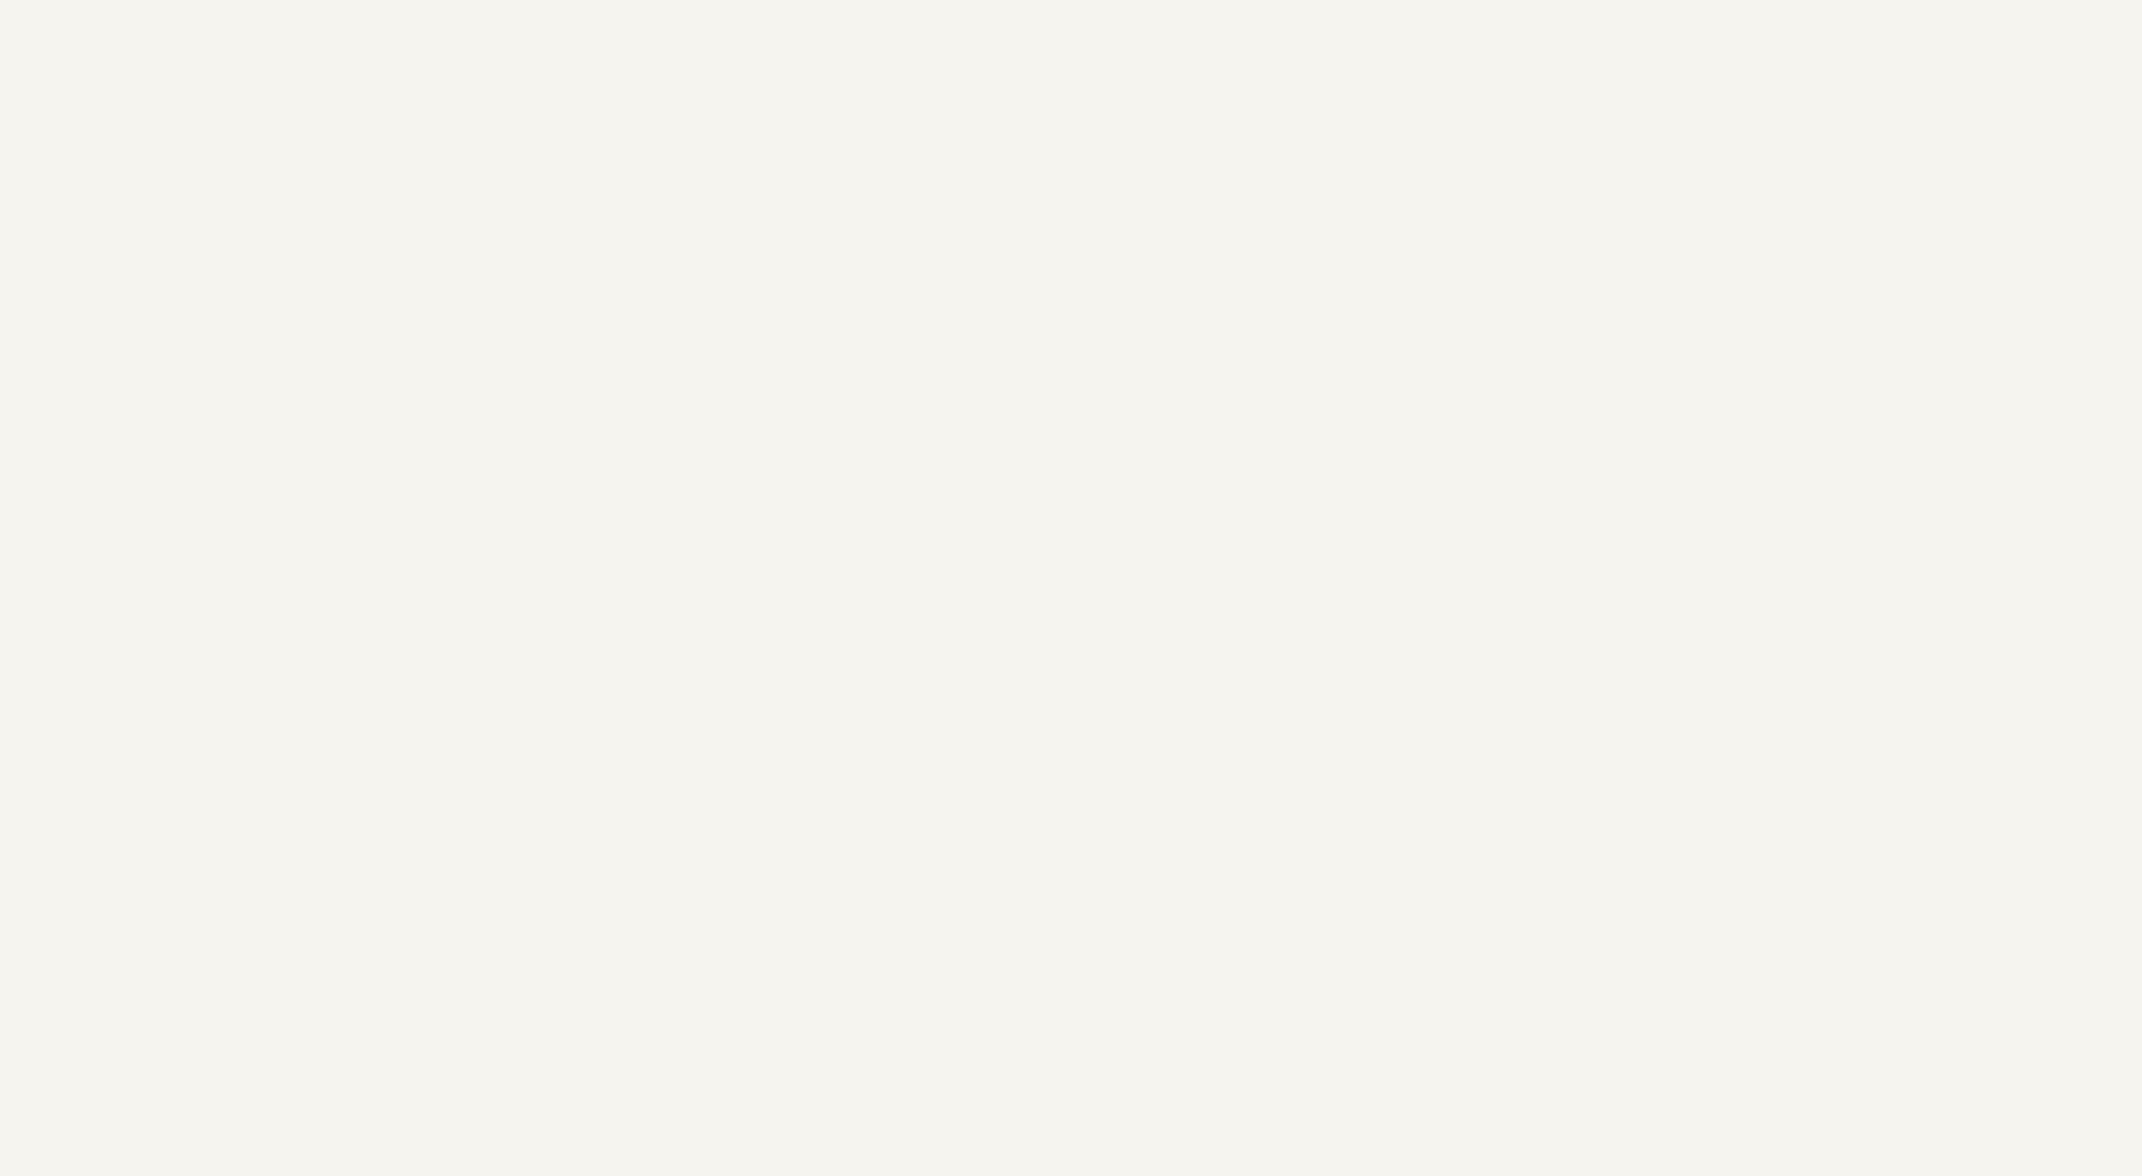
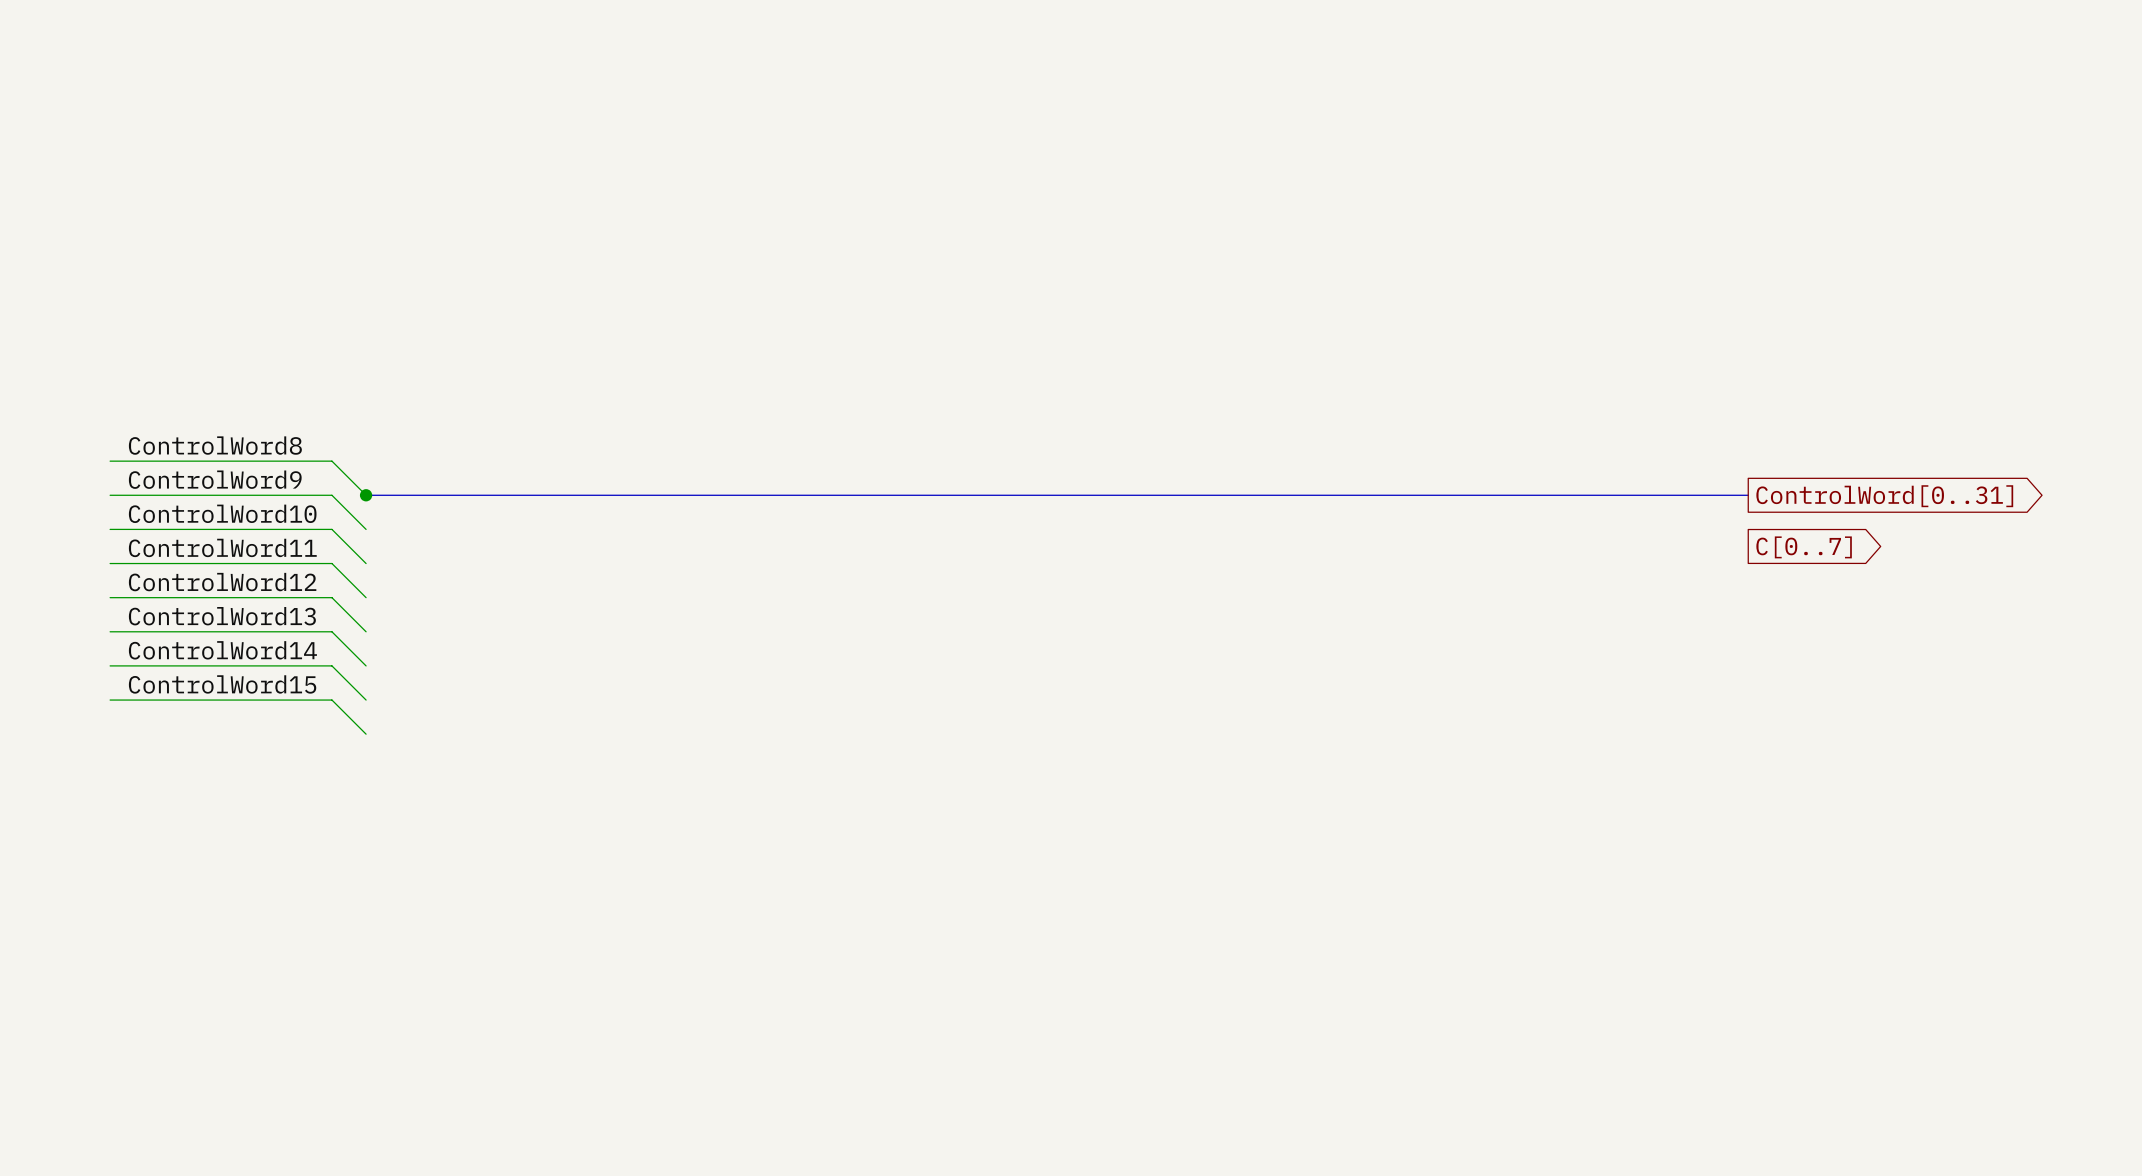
label: none -> ControlWord8 (215, 445)
wire: none -> (110, 461) (331, 461) (366, 495)
label: none -> ControlWord9 (215, 479)
wire: none -> (110, 495) (331, 495) (366, 529)
bus: none -> (366, 495) (1748, 495)
junction: none -> (366, 495)
global label: none -> ControlWord[0..31] (1884, 496)
label: none -> ControlWord10 (222, 513)
wire: none -> (110, 529) (331, 529) (366, 563)
label: none -> ControlWord11 (222, 547)
global label: none -> C[0..7] (1804, 547)
wire: none -> (110, 563) (331, 563) (366, 597)
label: none -> ControlWord12 (222, 582)
wire: none -> (110, 597) (331, 597) (366, 631)
label: none -> ControlWord13 (222, 616)
wire: none -> (110, 631) (331, 631) (366, 665)
label: none -> ControlWord14 (222, 650)
wire: none -> (110, 665) (331, 665) (366, 700)
label: none -> ControlWord15 (222, 684)
wire: none -> (110, 700) (331, 700) (366, 734)

